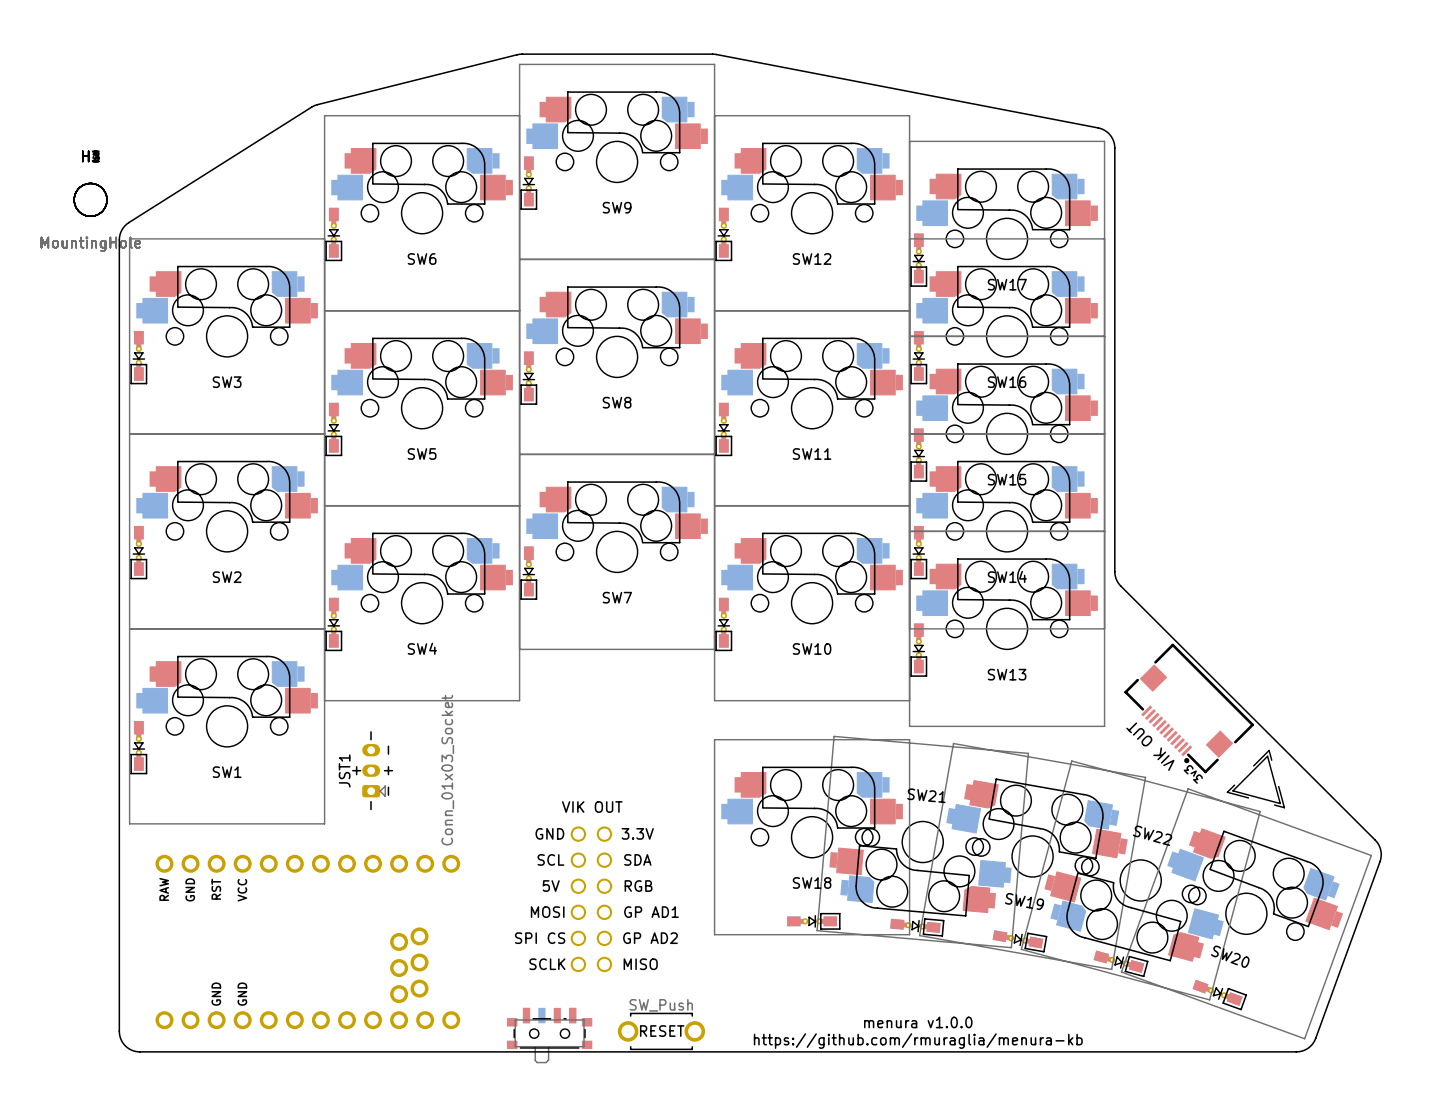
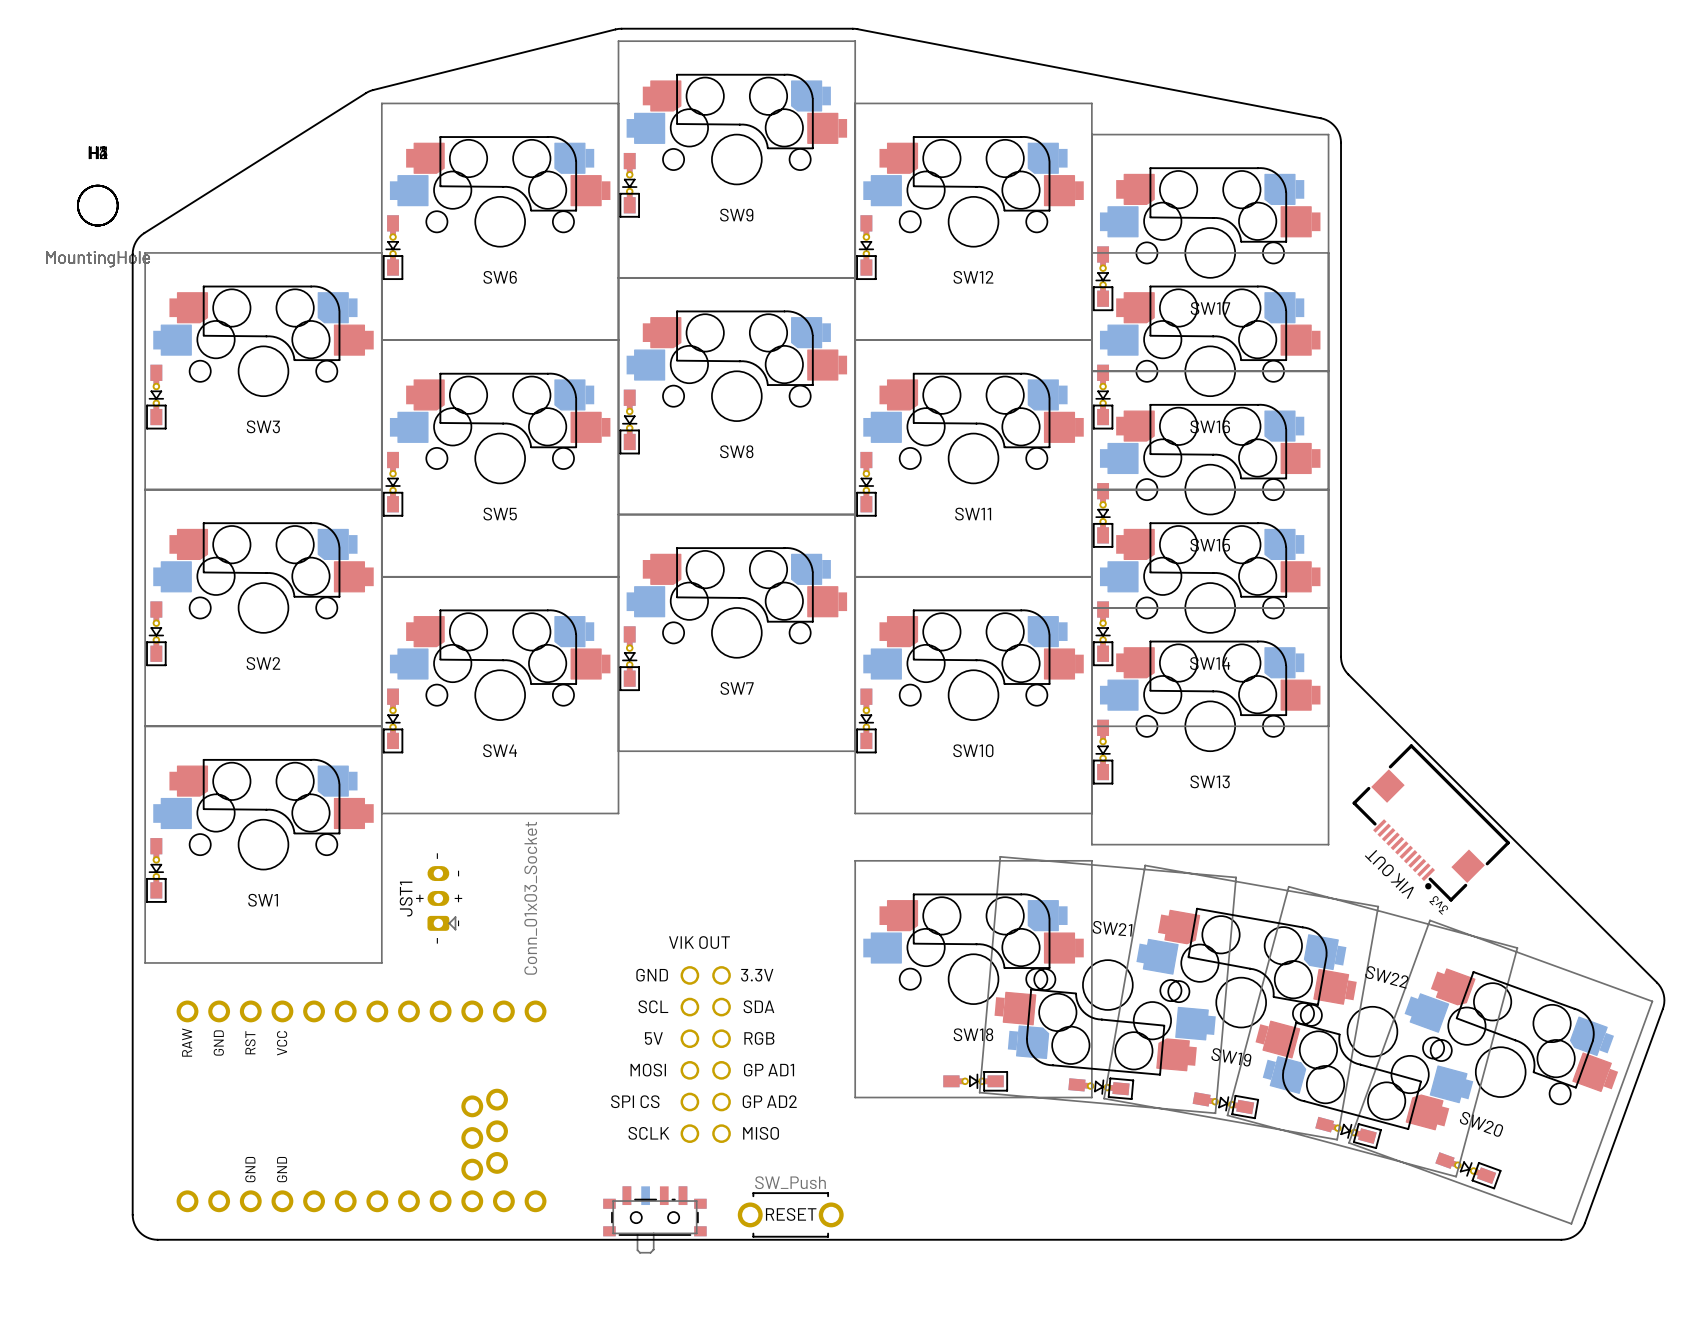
drawing: [1226, 749, 1285, 809] -> none
drawing: [753, 1016, 1083, 1049] -> none

